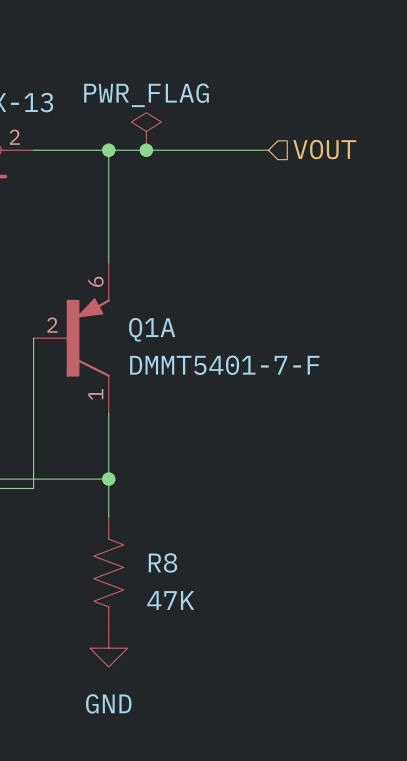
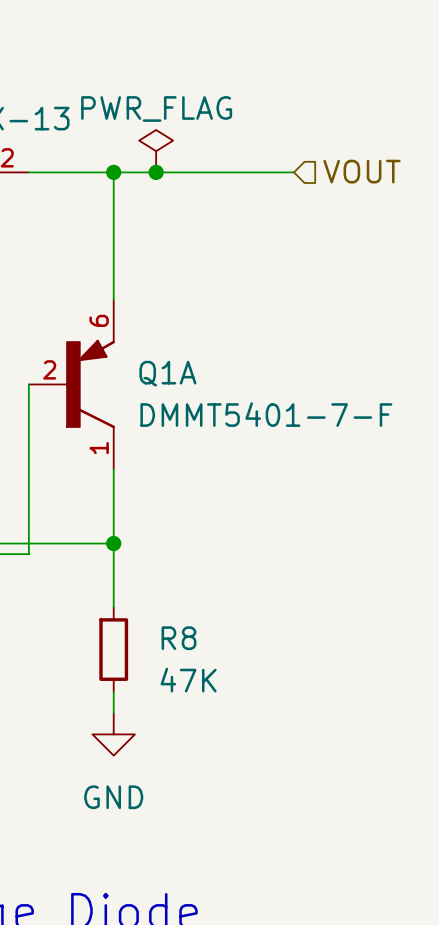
R8 symbol: [93, 516, 124, 630] -> [99, 607, 129, 692]

